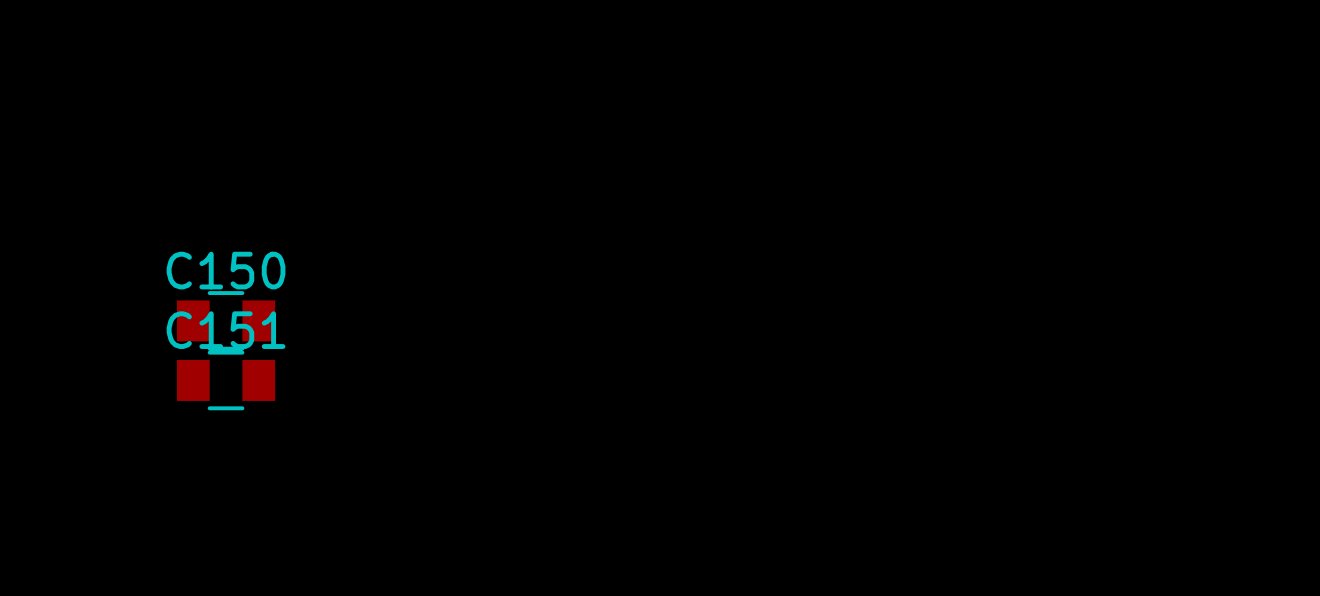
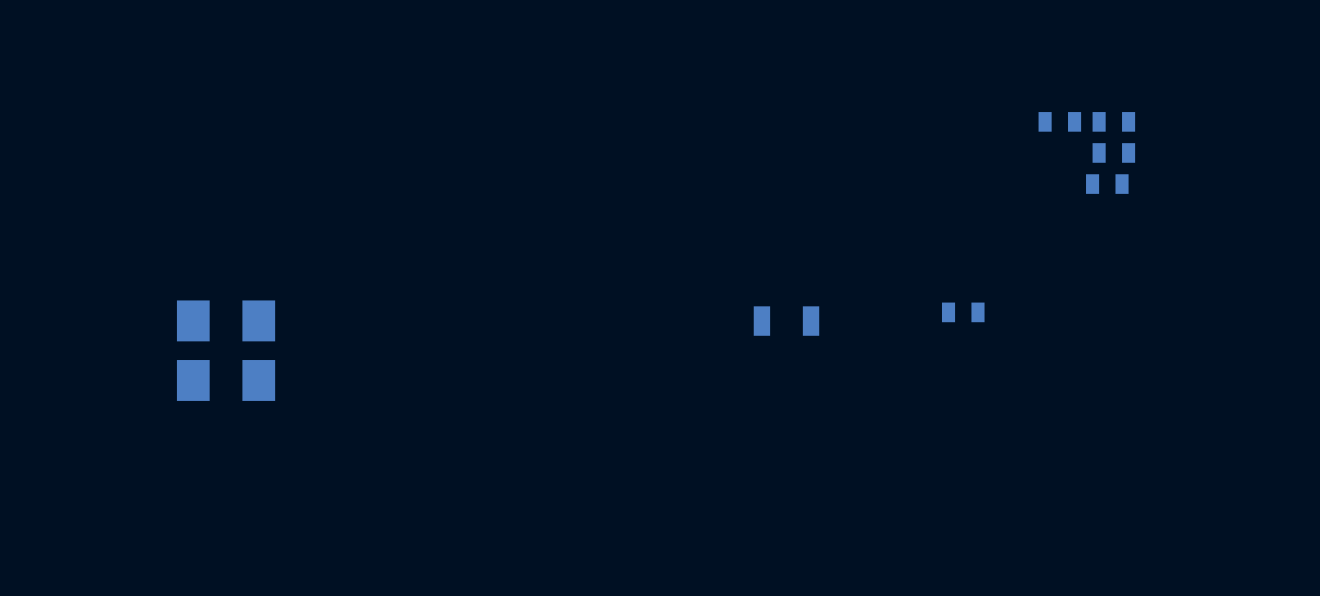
part: none -> (1059, 121)
part: none -> (1113, 121)
part: none -> (1113, 152)
part: none -> (1107, 184)
part: none -> (963, 312)
C150 side: top (226, 320) -> bottom (226, 320)
part: none -> (786, 321)
C151 side: top (226, 380) -> bottom (226, 380)

